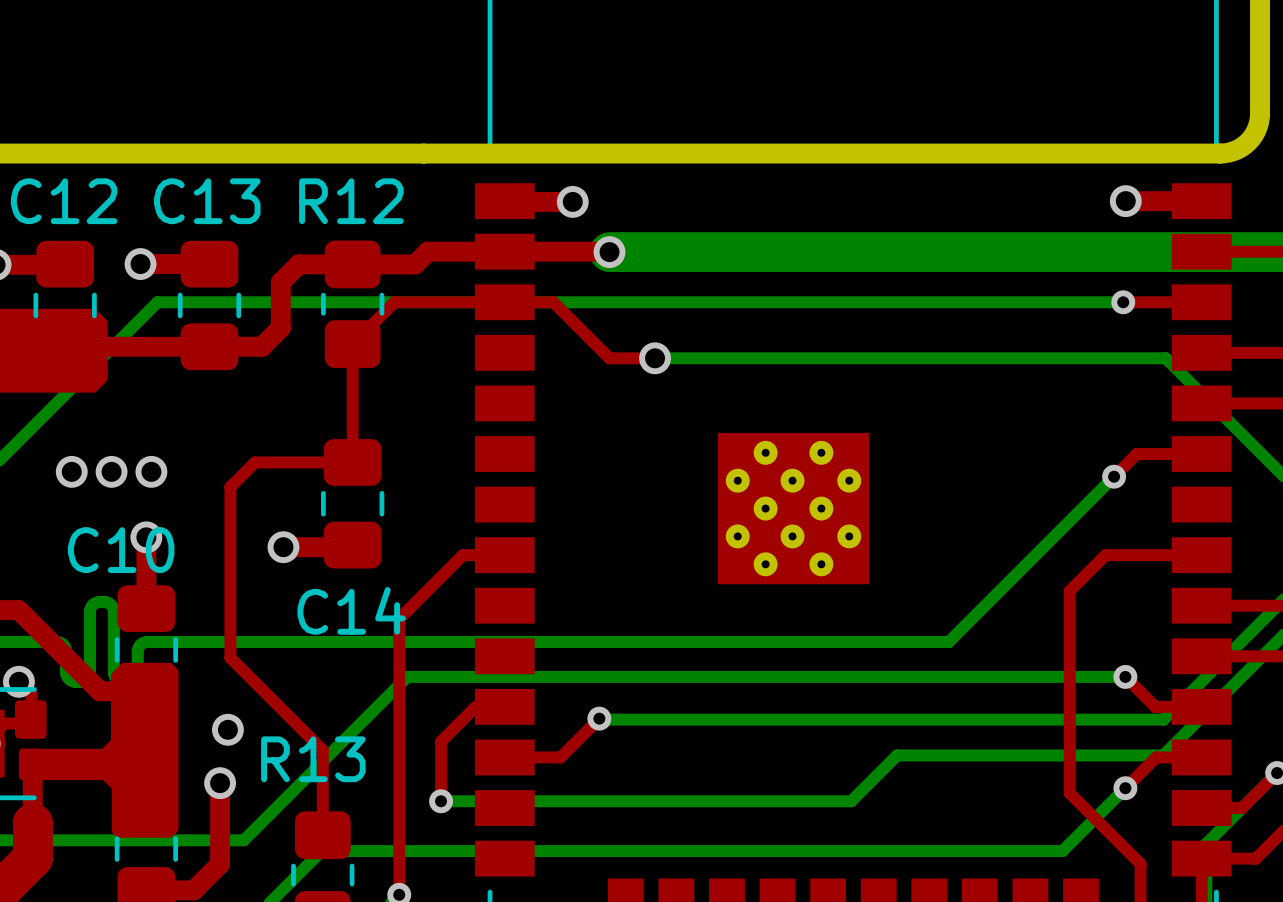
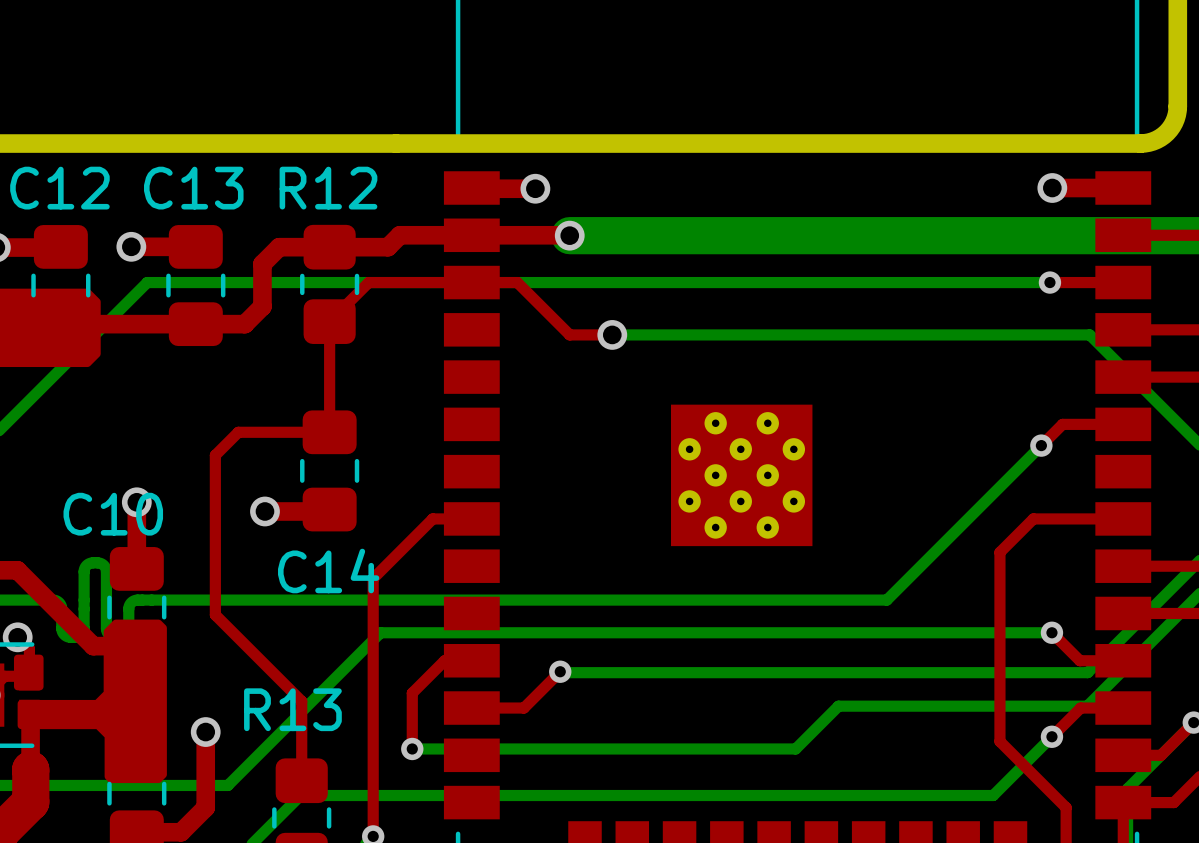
via: (71, 471) -> none
via: (111, 471) -> none
via: (151, 471) -> none
via: (227, 729) -> none

